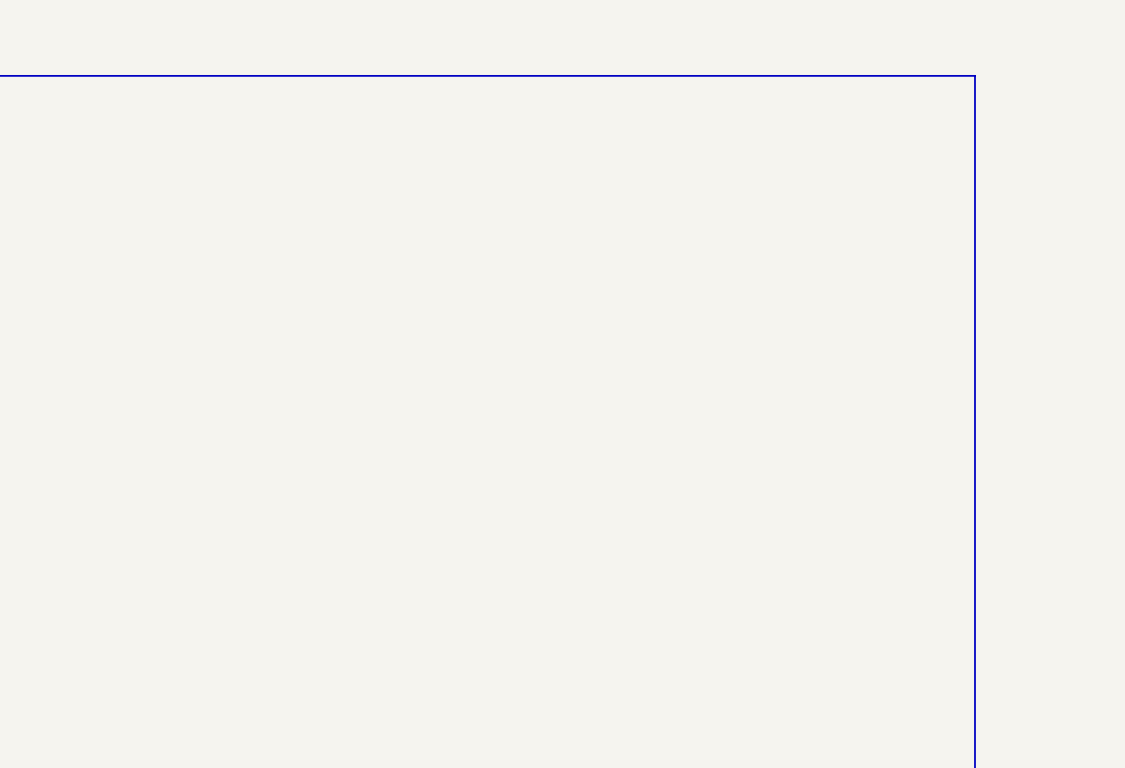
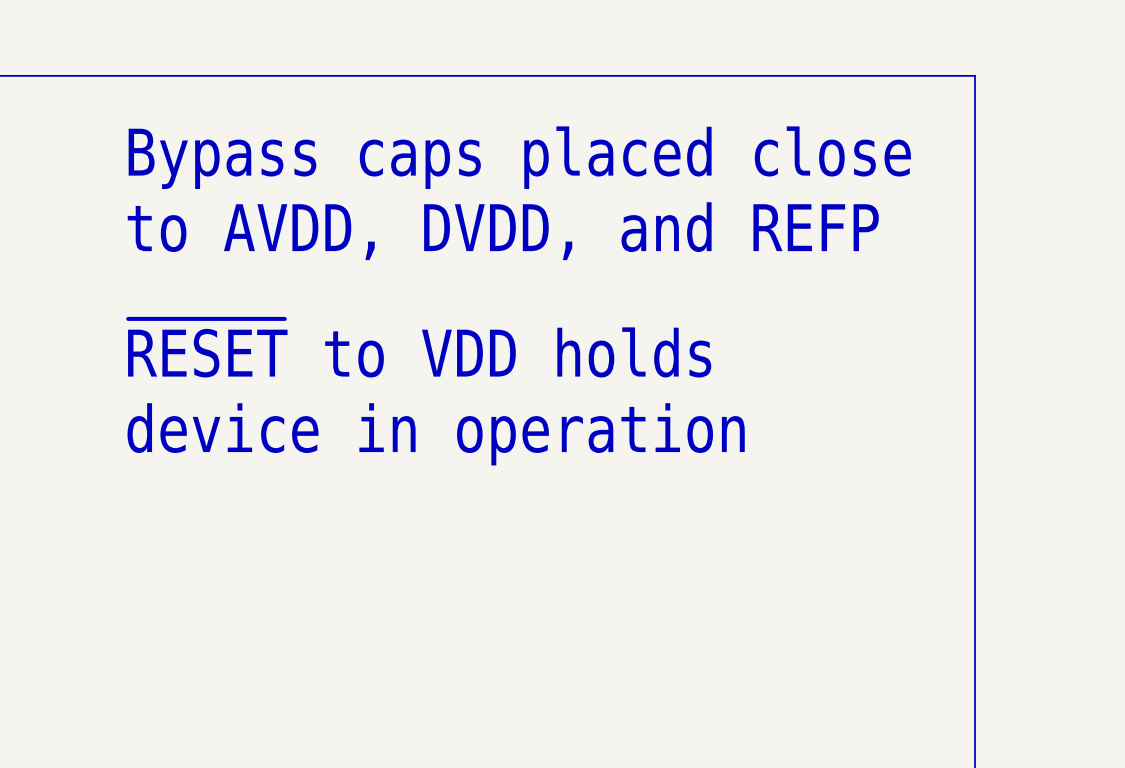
text: none -> Bypass caps placed close (519, 157)
text: none -> to AVDD, DVDD, and REFP (503, 231)
text: none -> ~{RESET} to VDD holds (419, 348)
text: none -> device in operation (436, 434)

